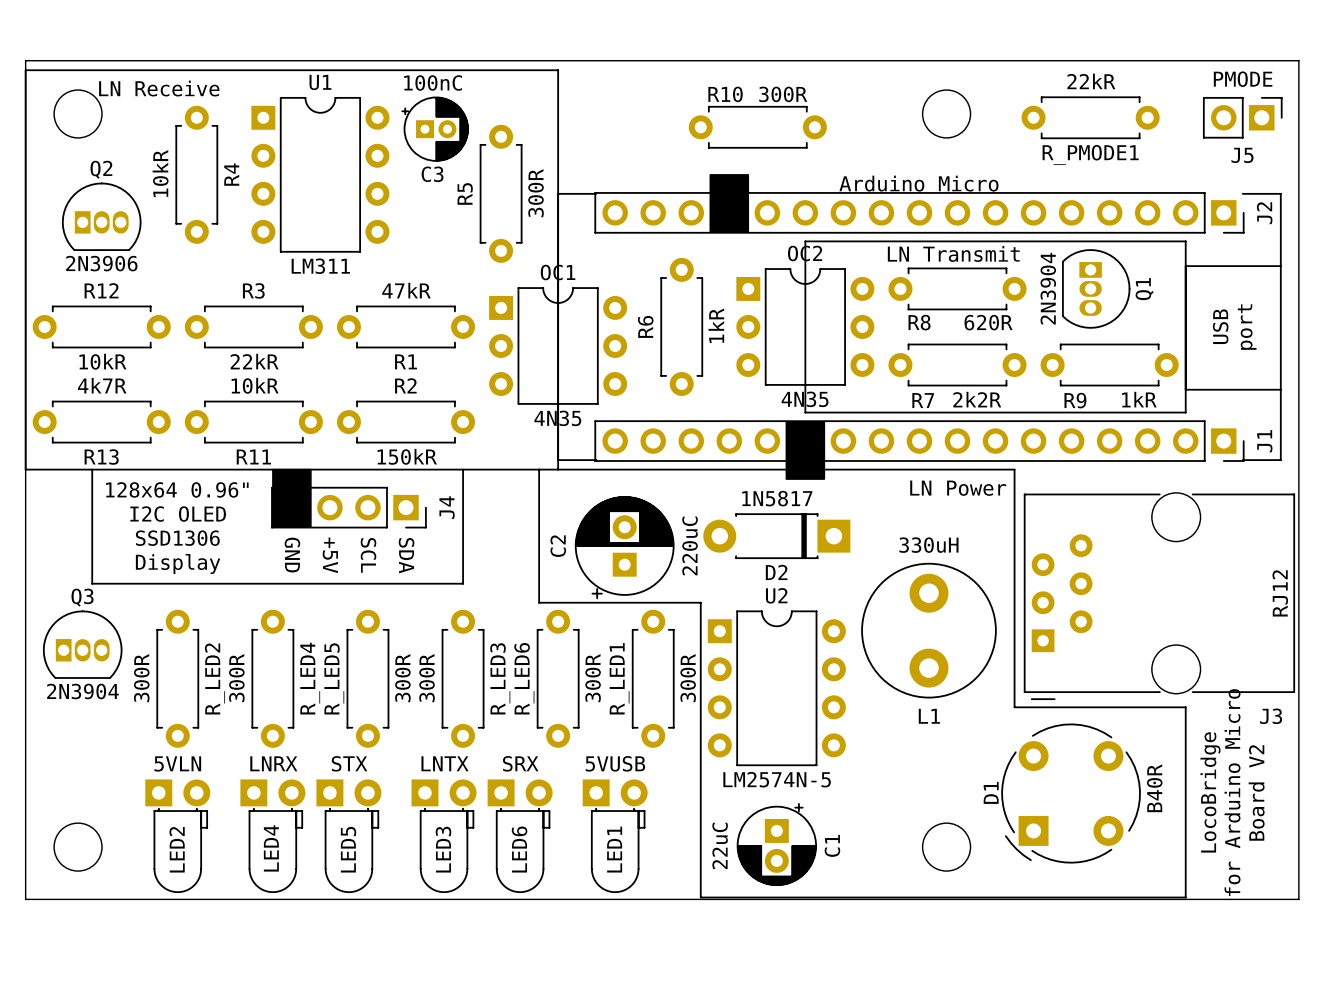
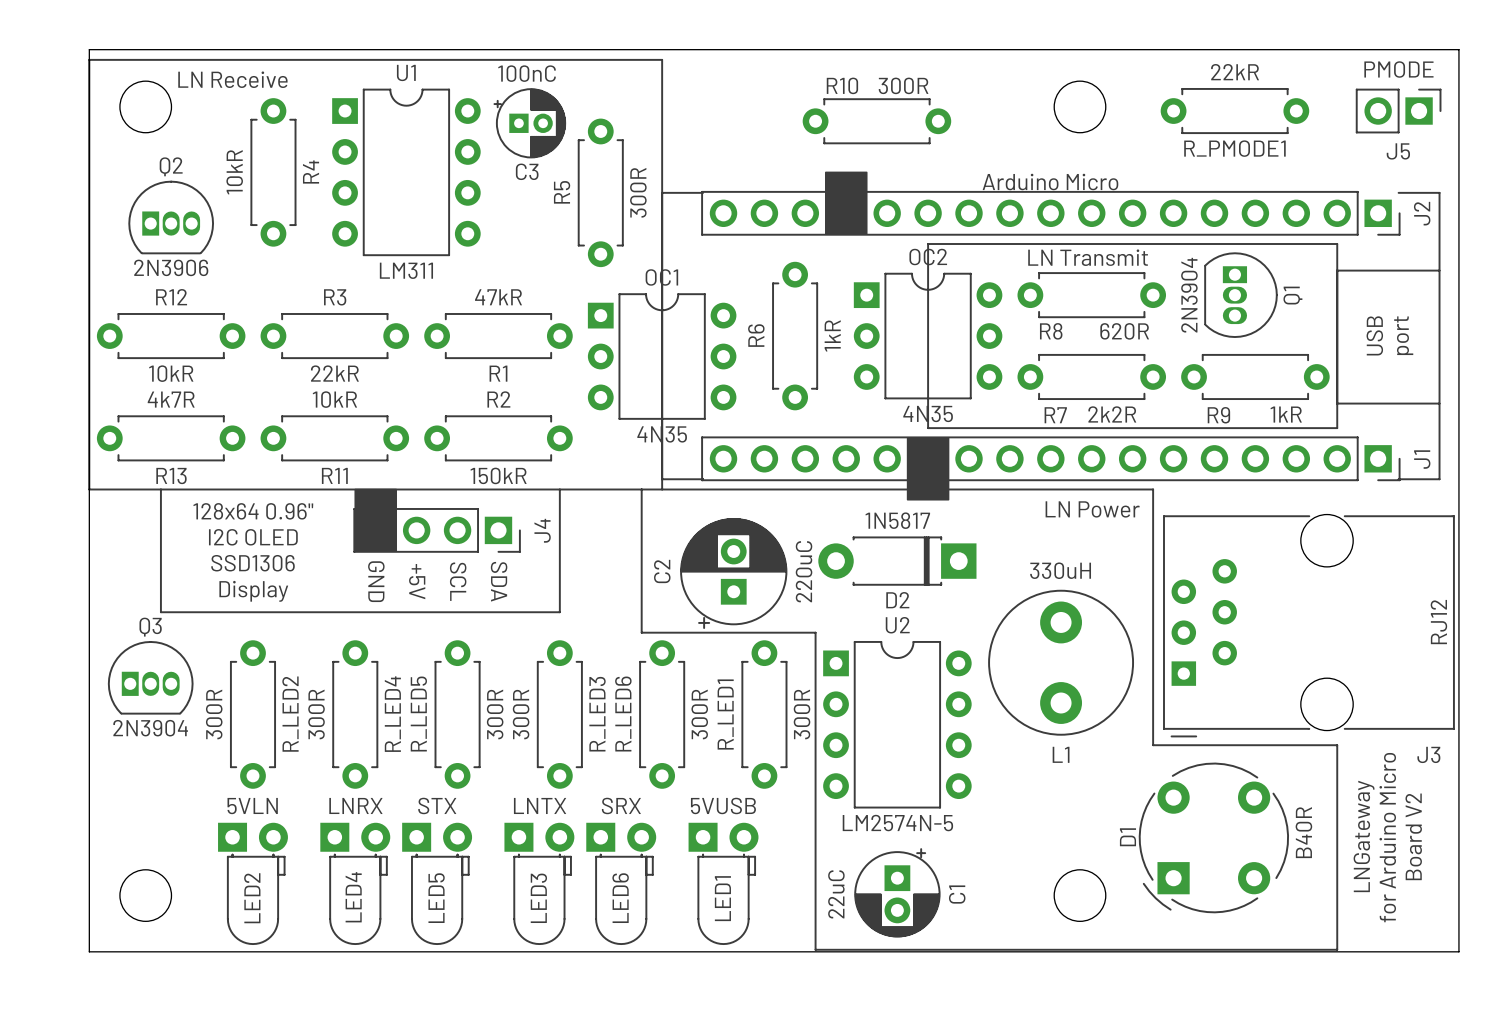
text: LocoBridge (1210, 792) -> LNGateway (1364, 836)

